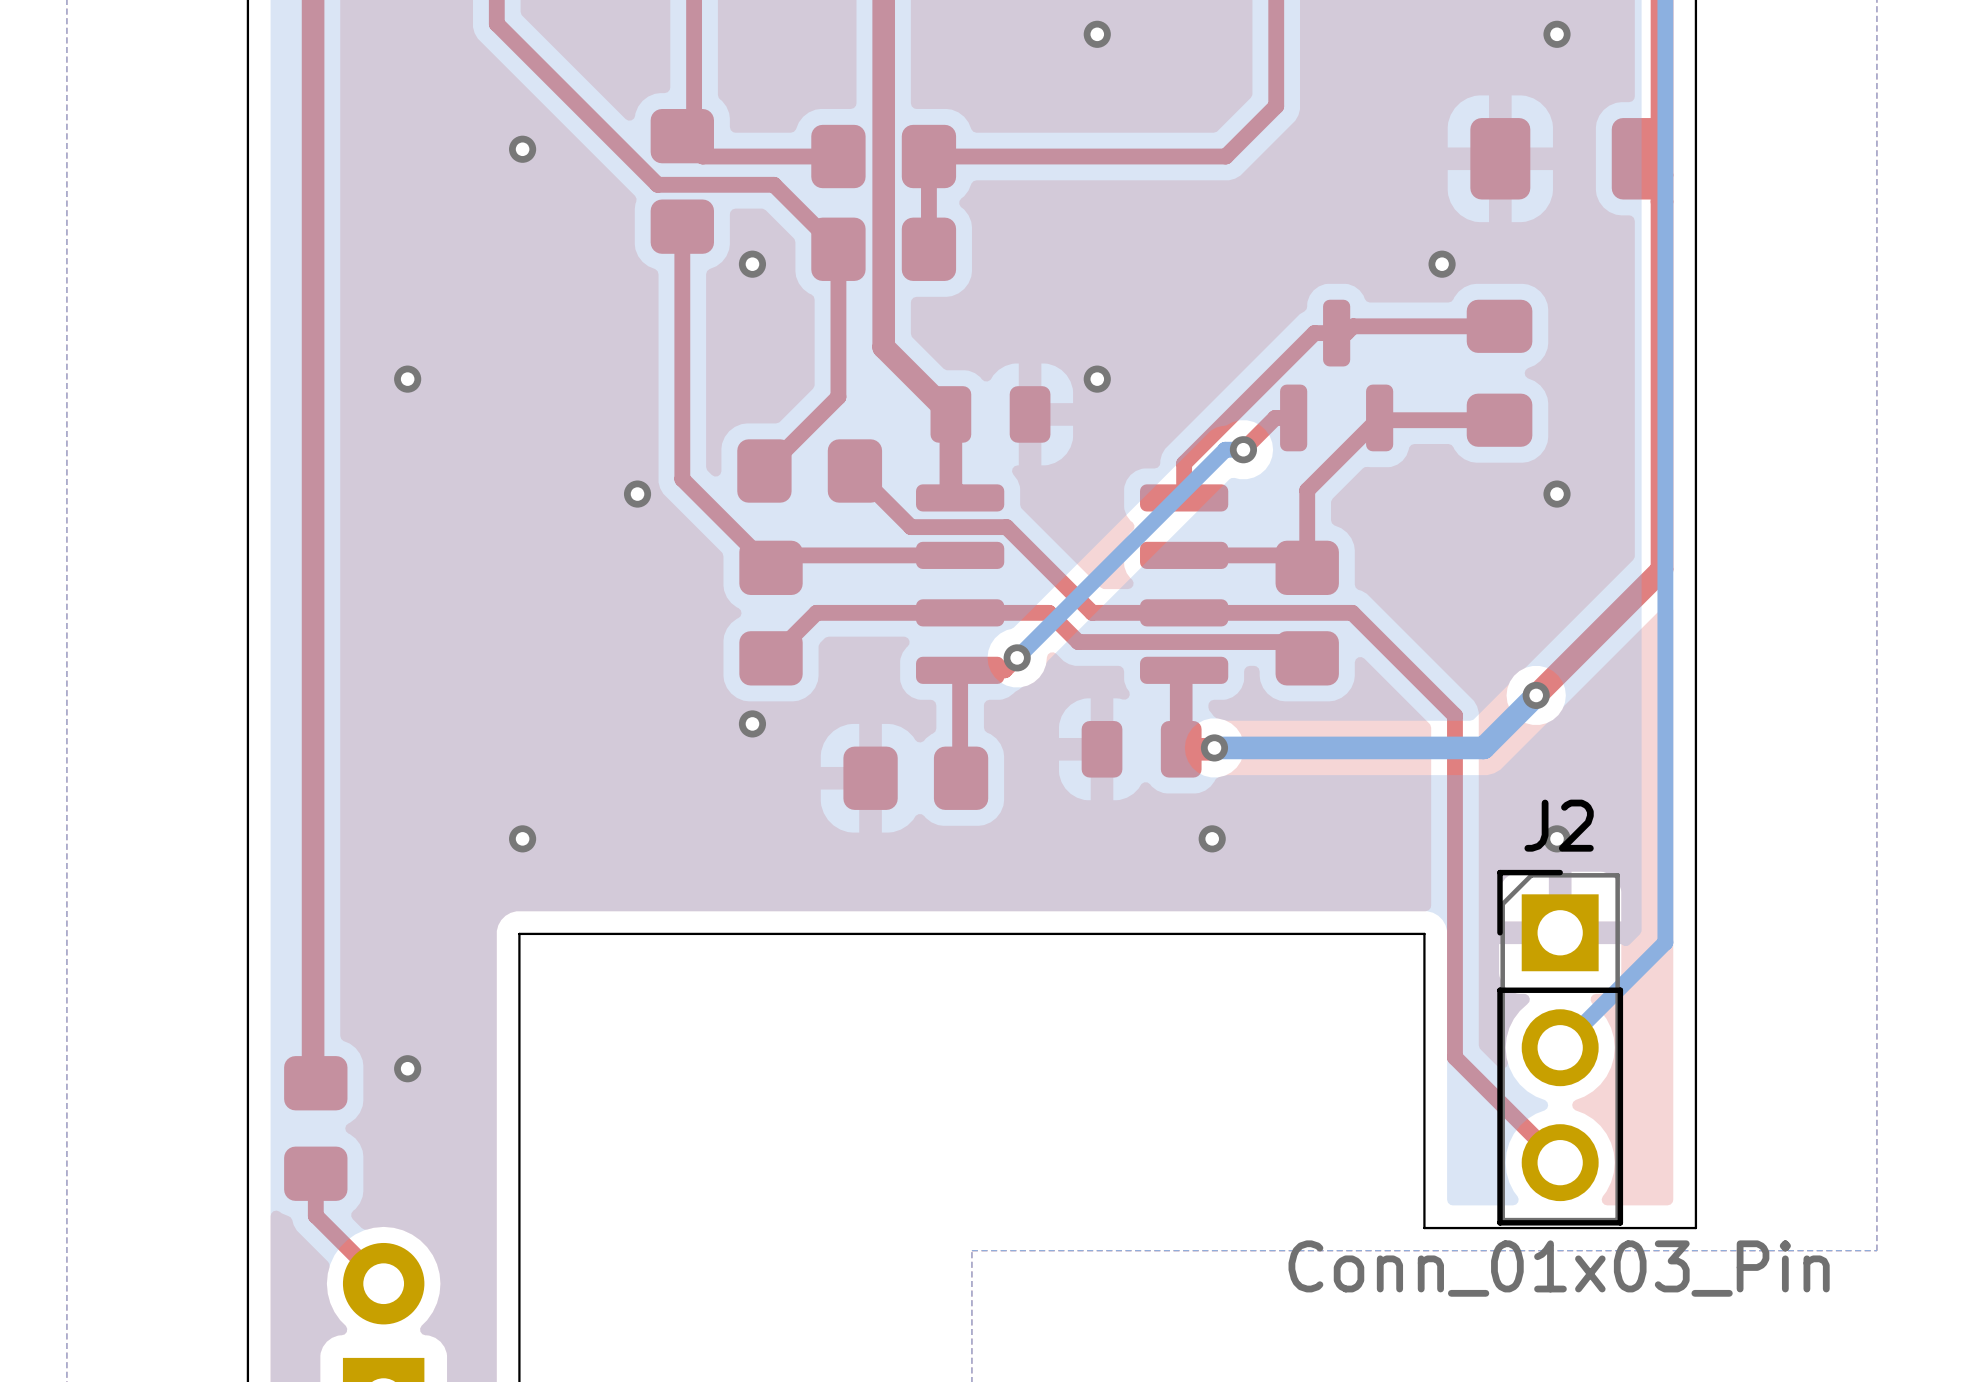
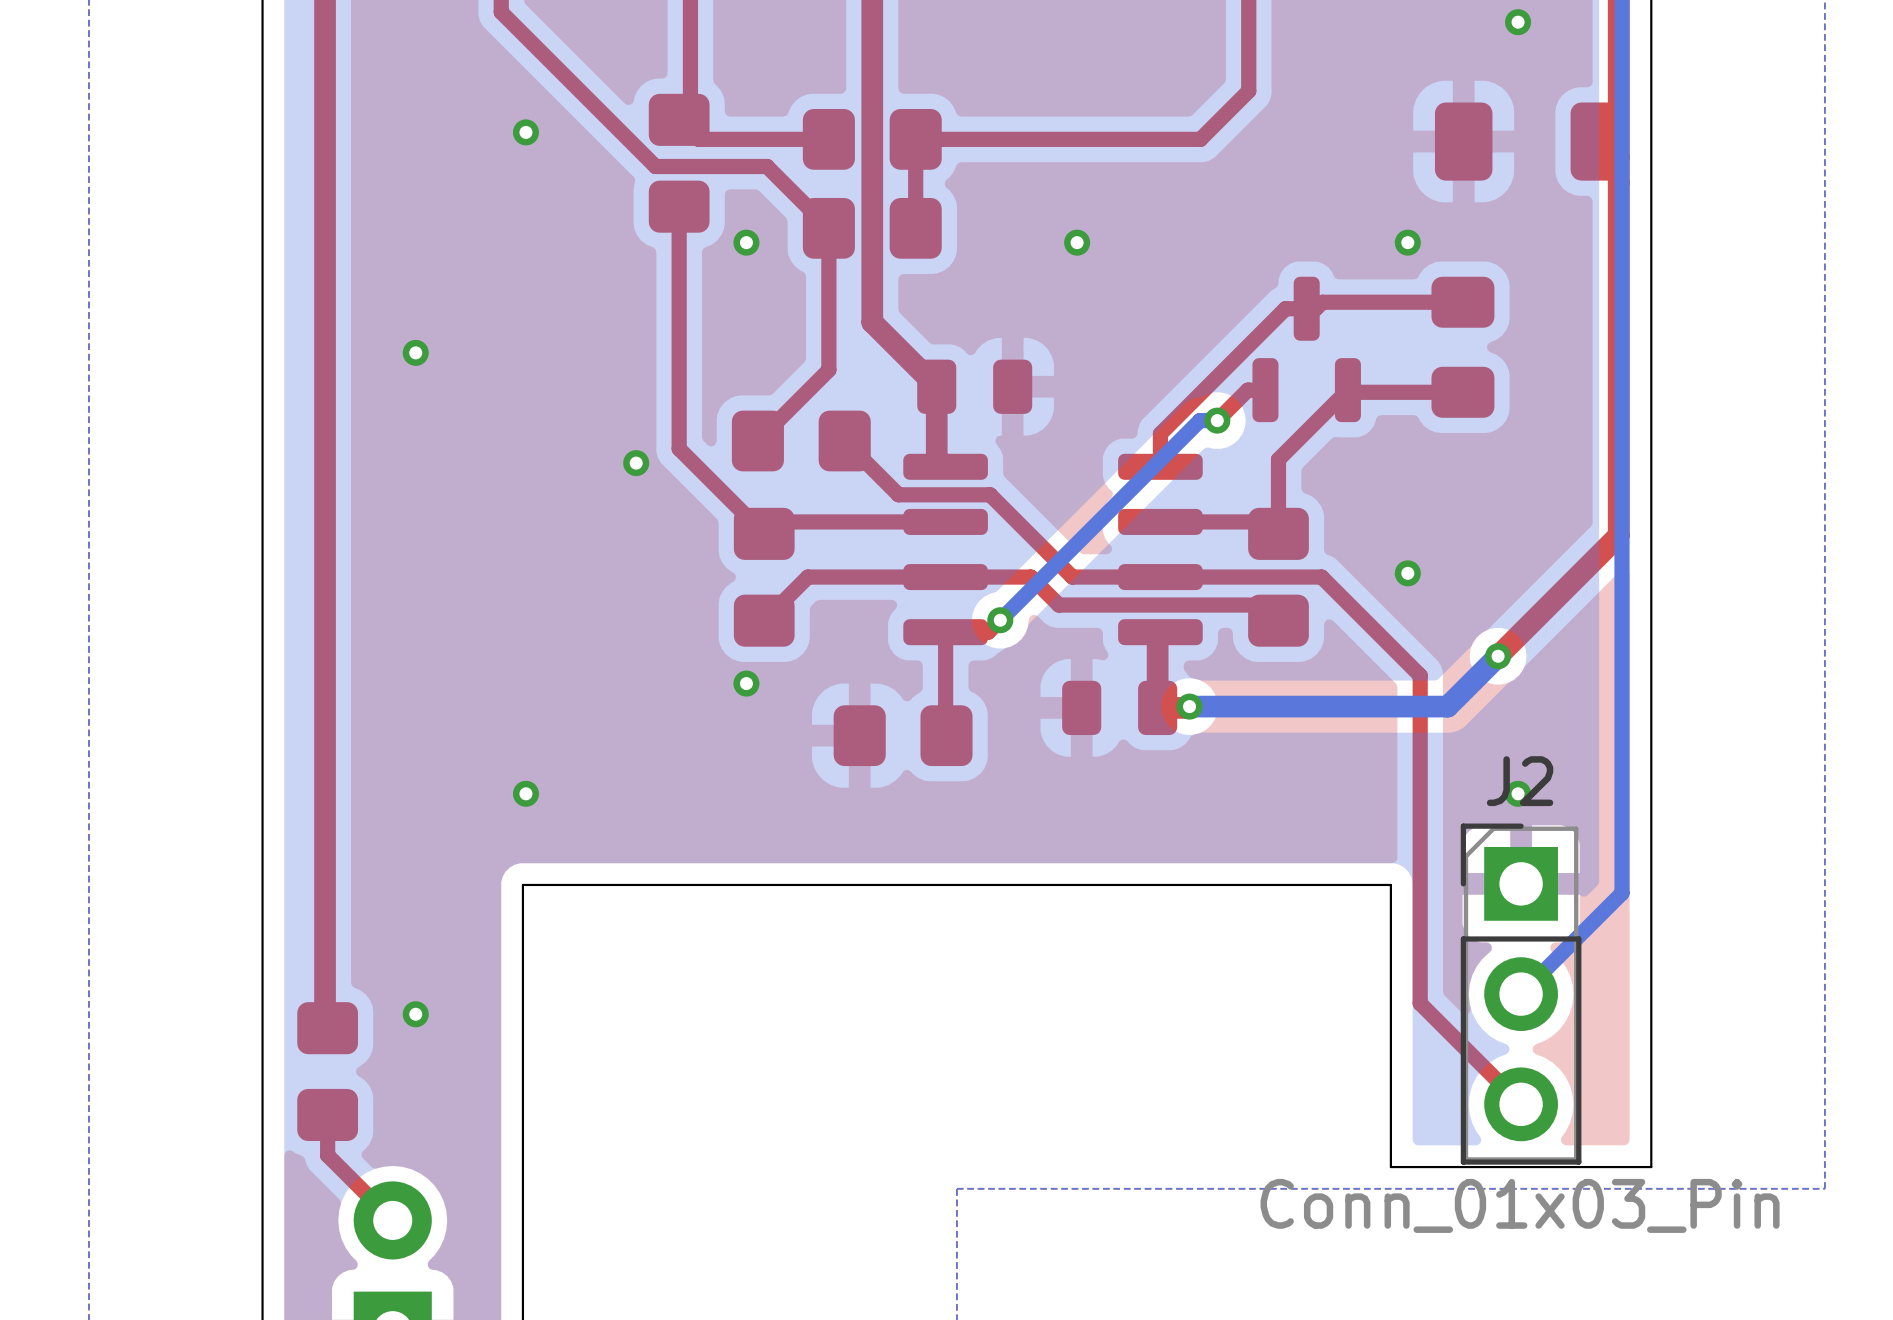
via: (1097, 34) -> none
via: none -> (1077, 242)
via: (1097, 379) -> none
via: (1557, 494) -> none
via: none -> (1407, 573)
via: (1212, 838) -> none

